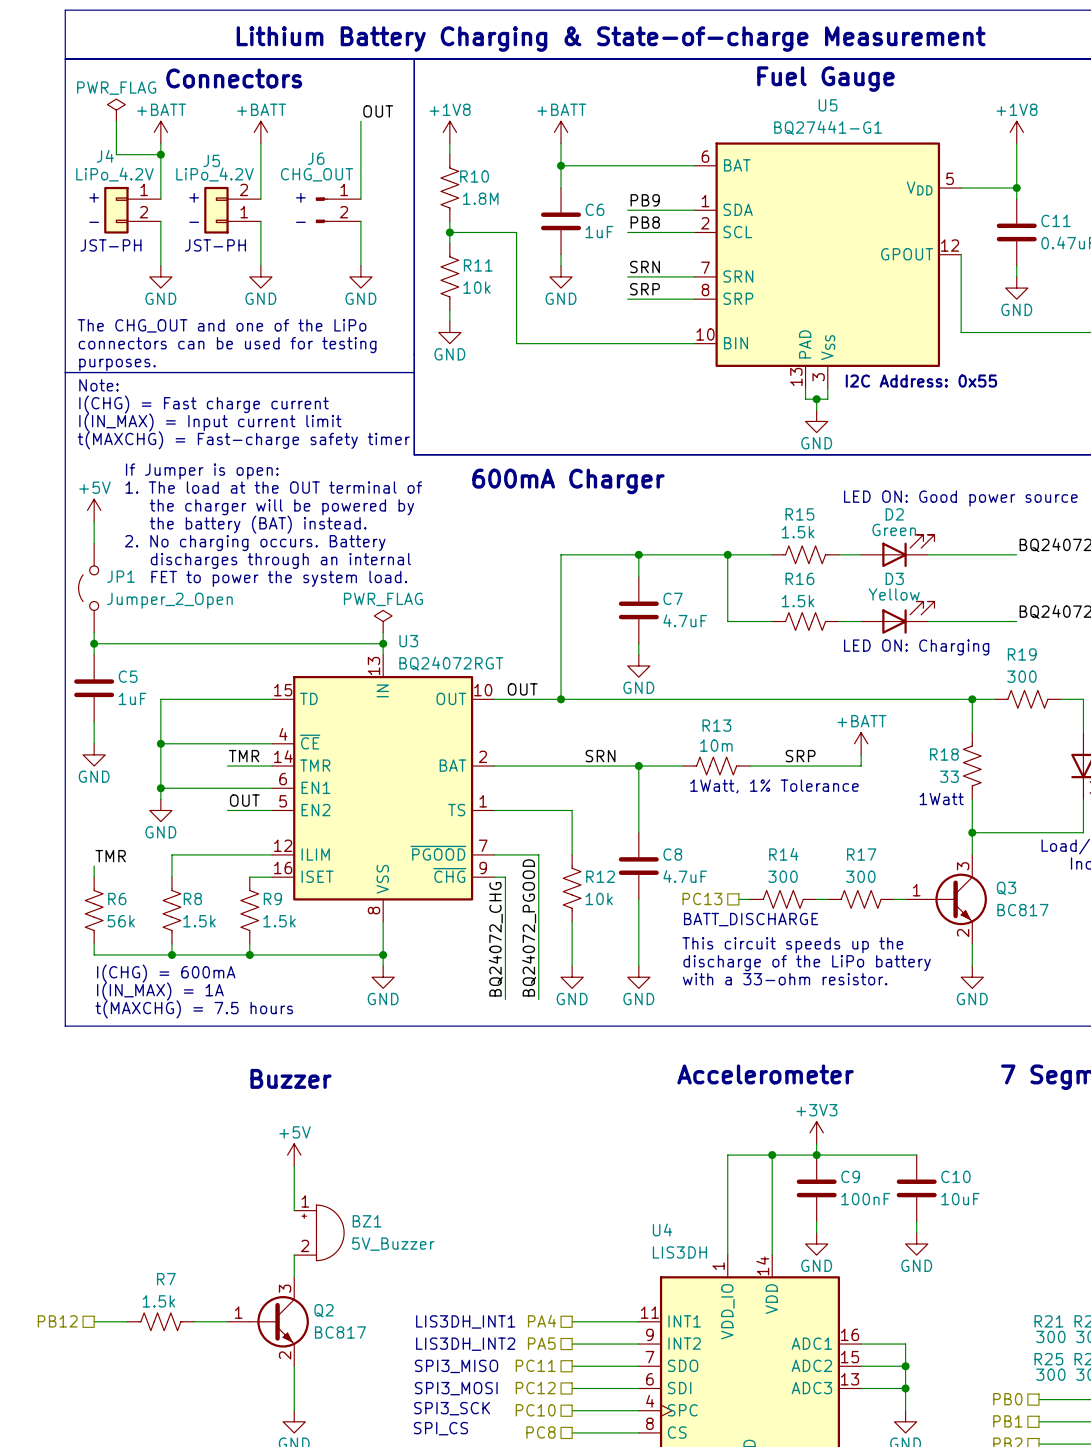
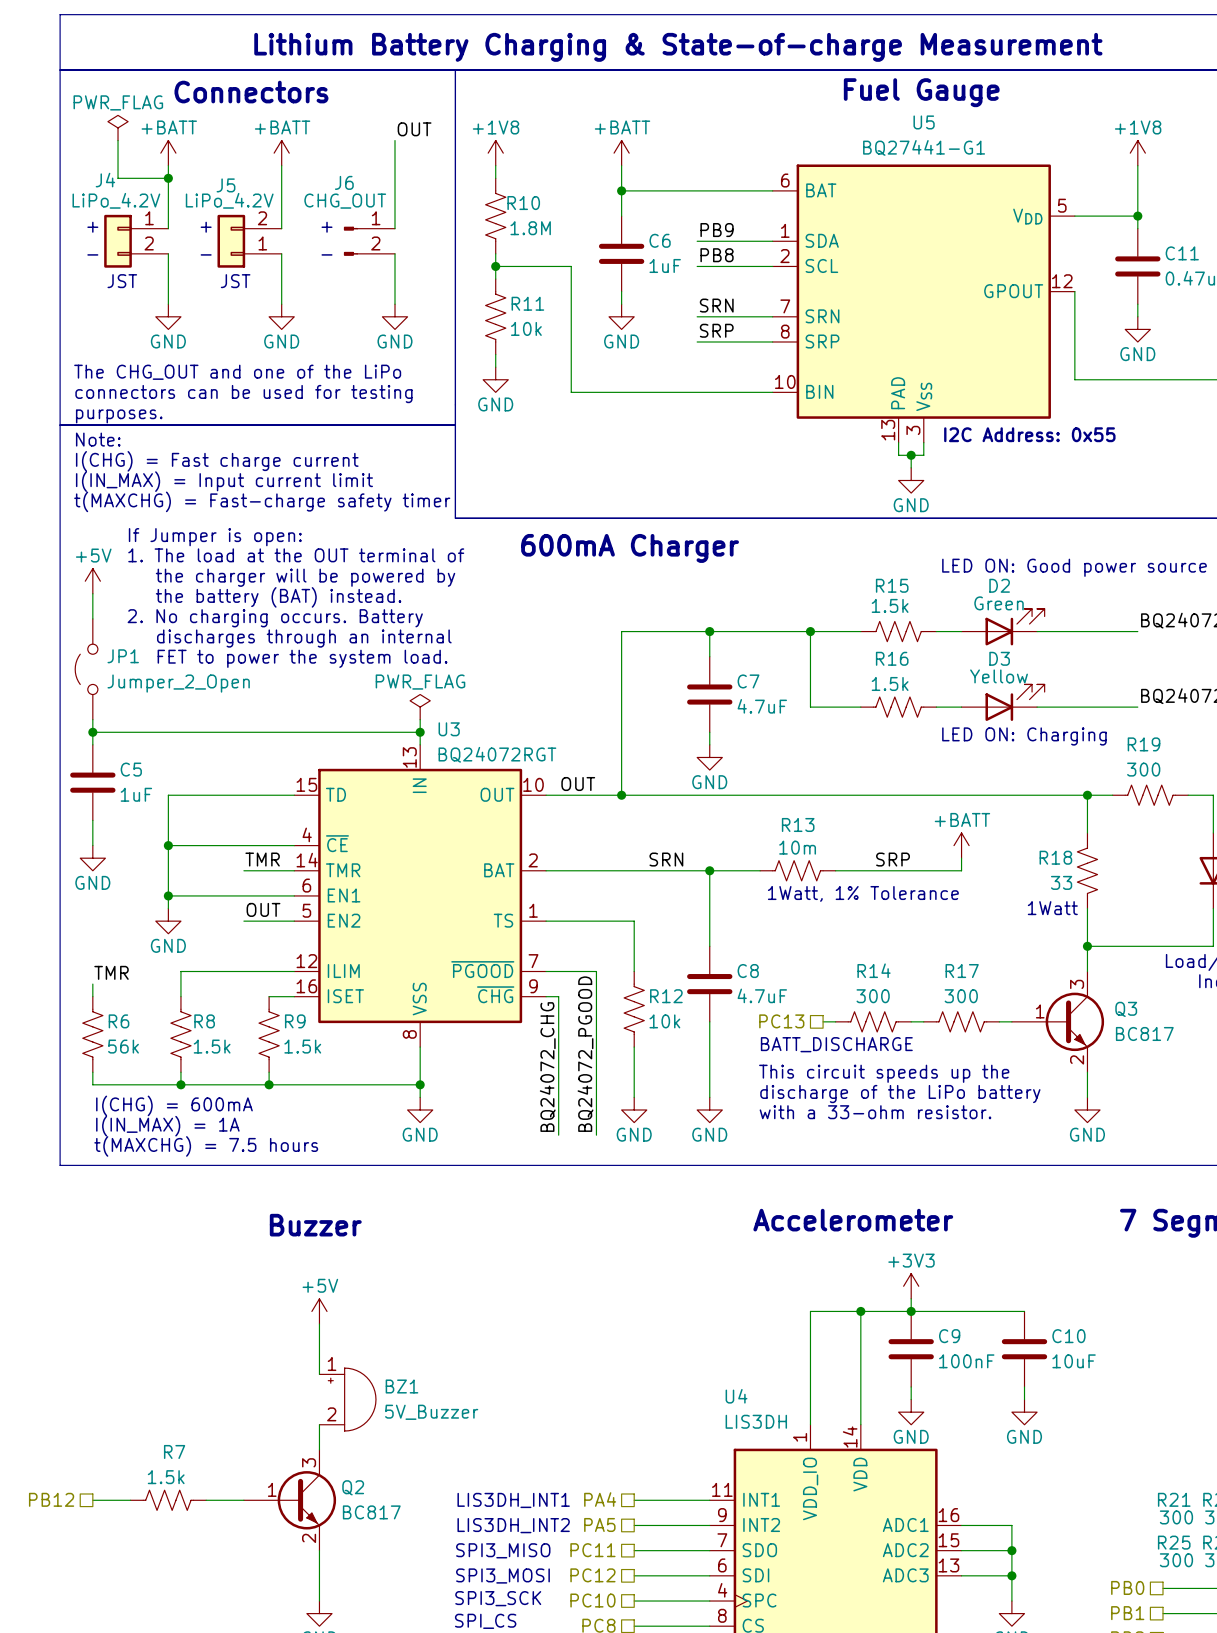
text: JST-PH (110, 245) -> JST (122, 281)
text: JST-PH (215, 245) -> JST (235, 281)
Q3 symbol: [905, 854, 987, 944] -> [1011, 971, 1105, 1073]
Q2 symbol: [227, 1277, 309, 1367] -> [243, 1449, 337, 1551]

